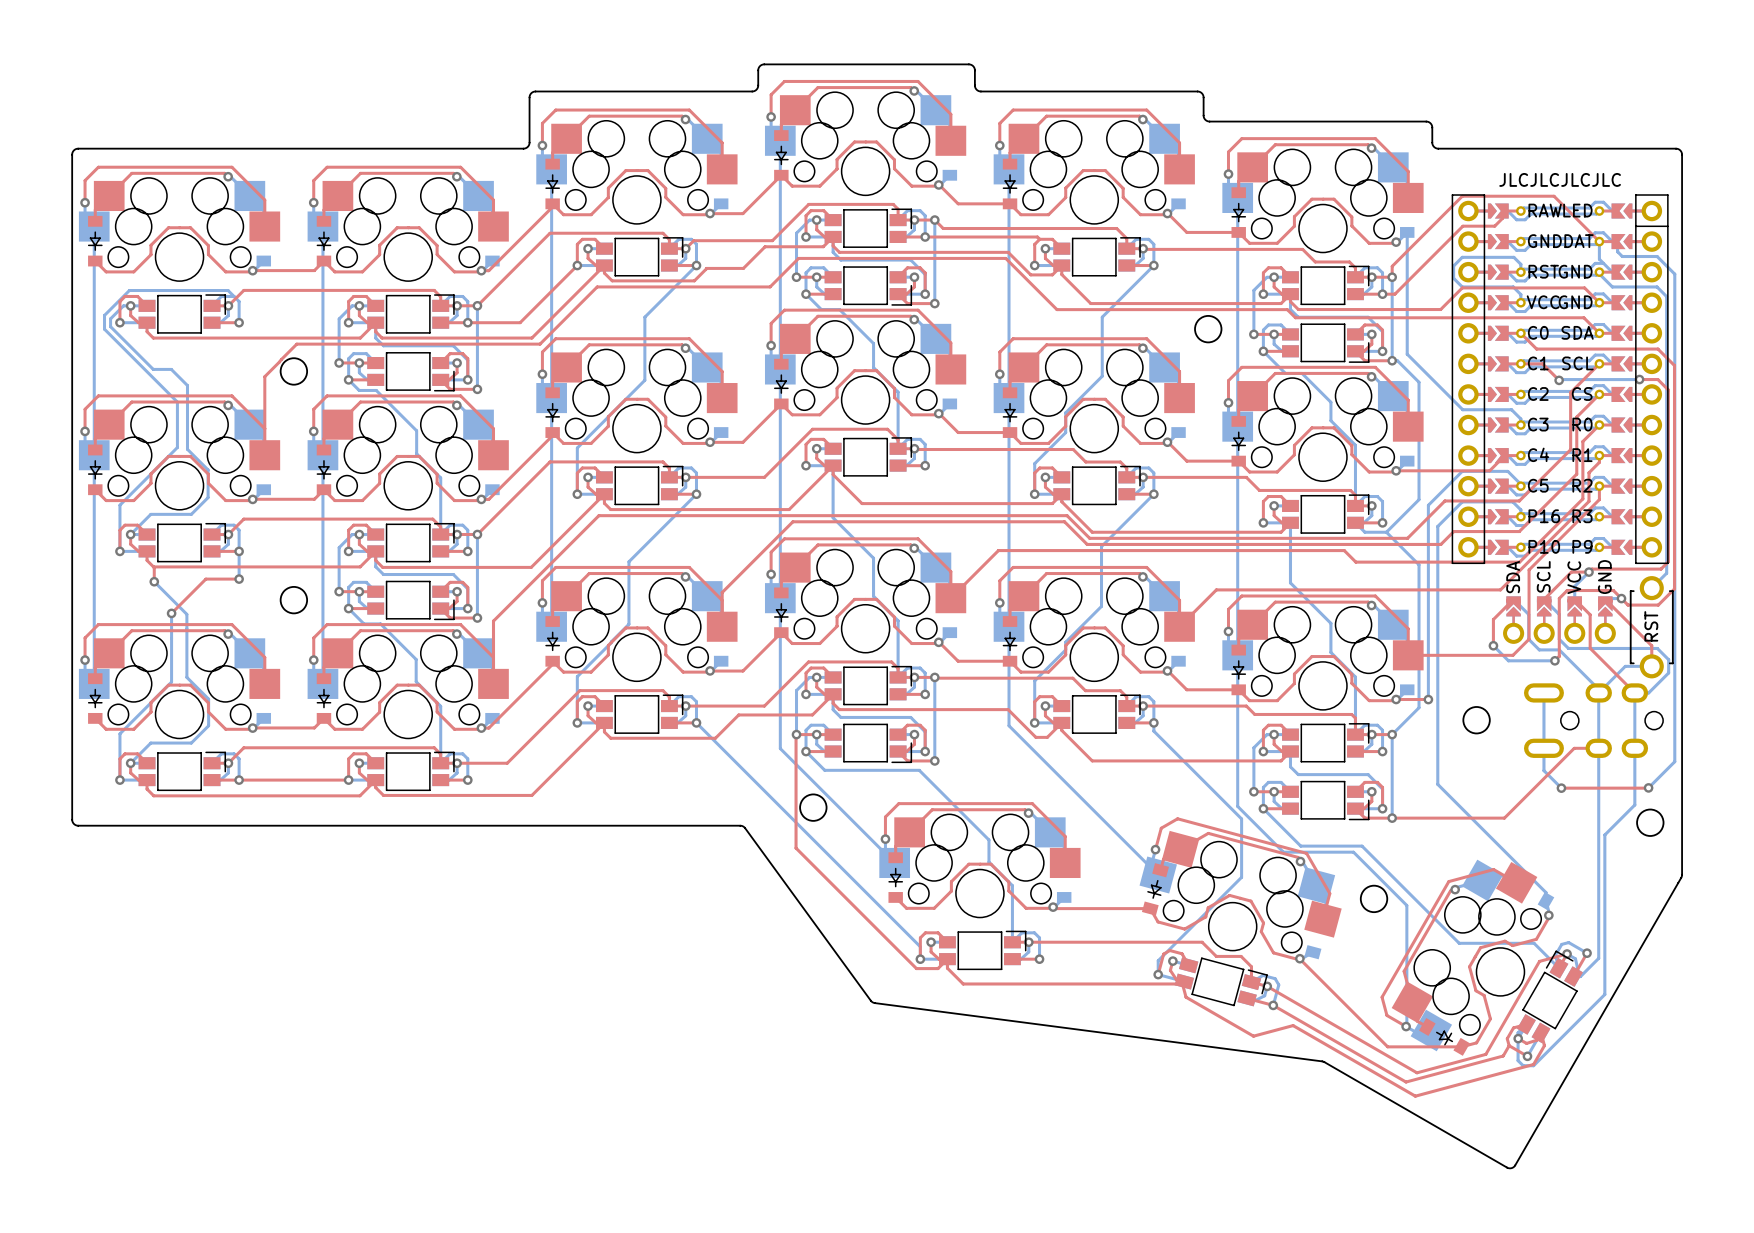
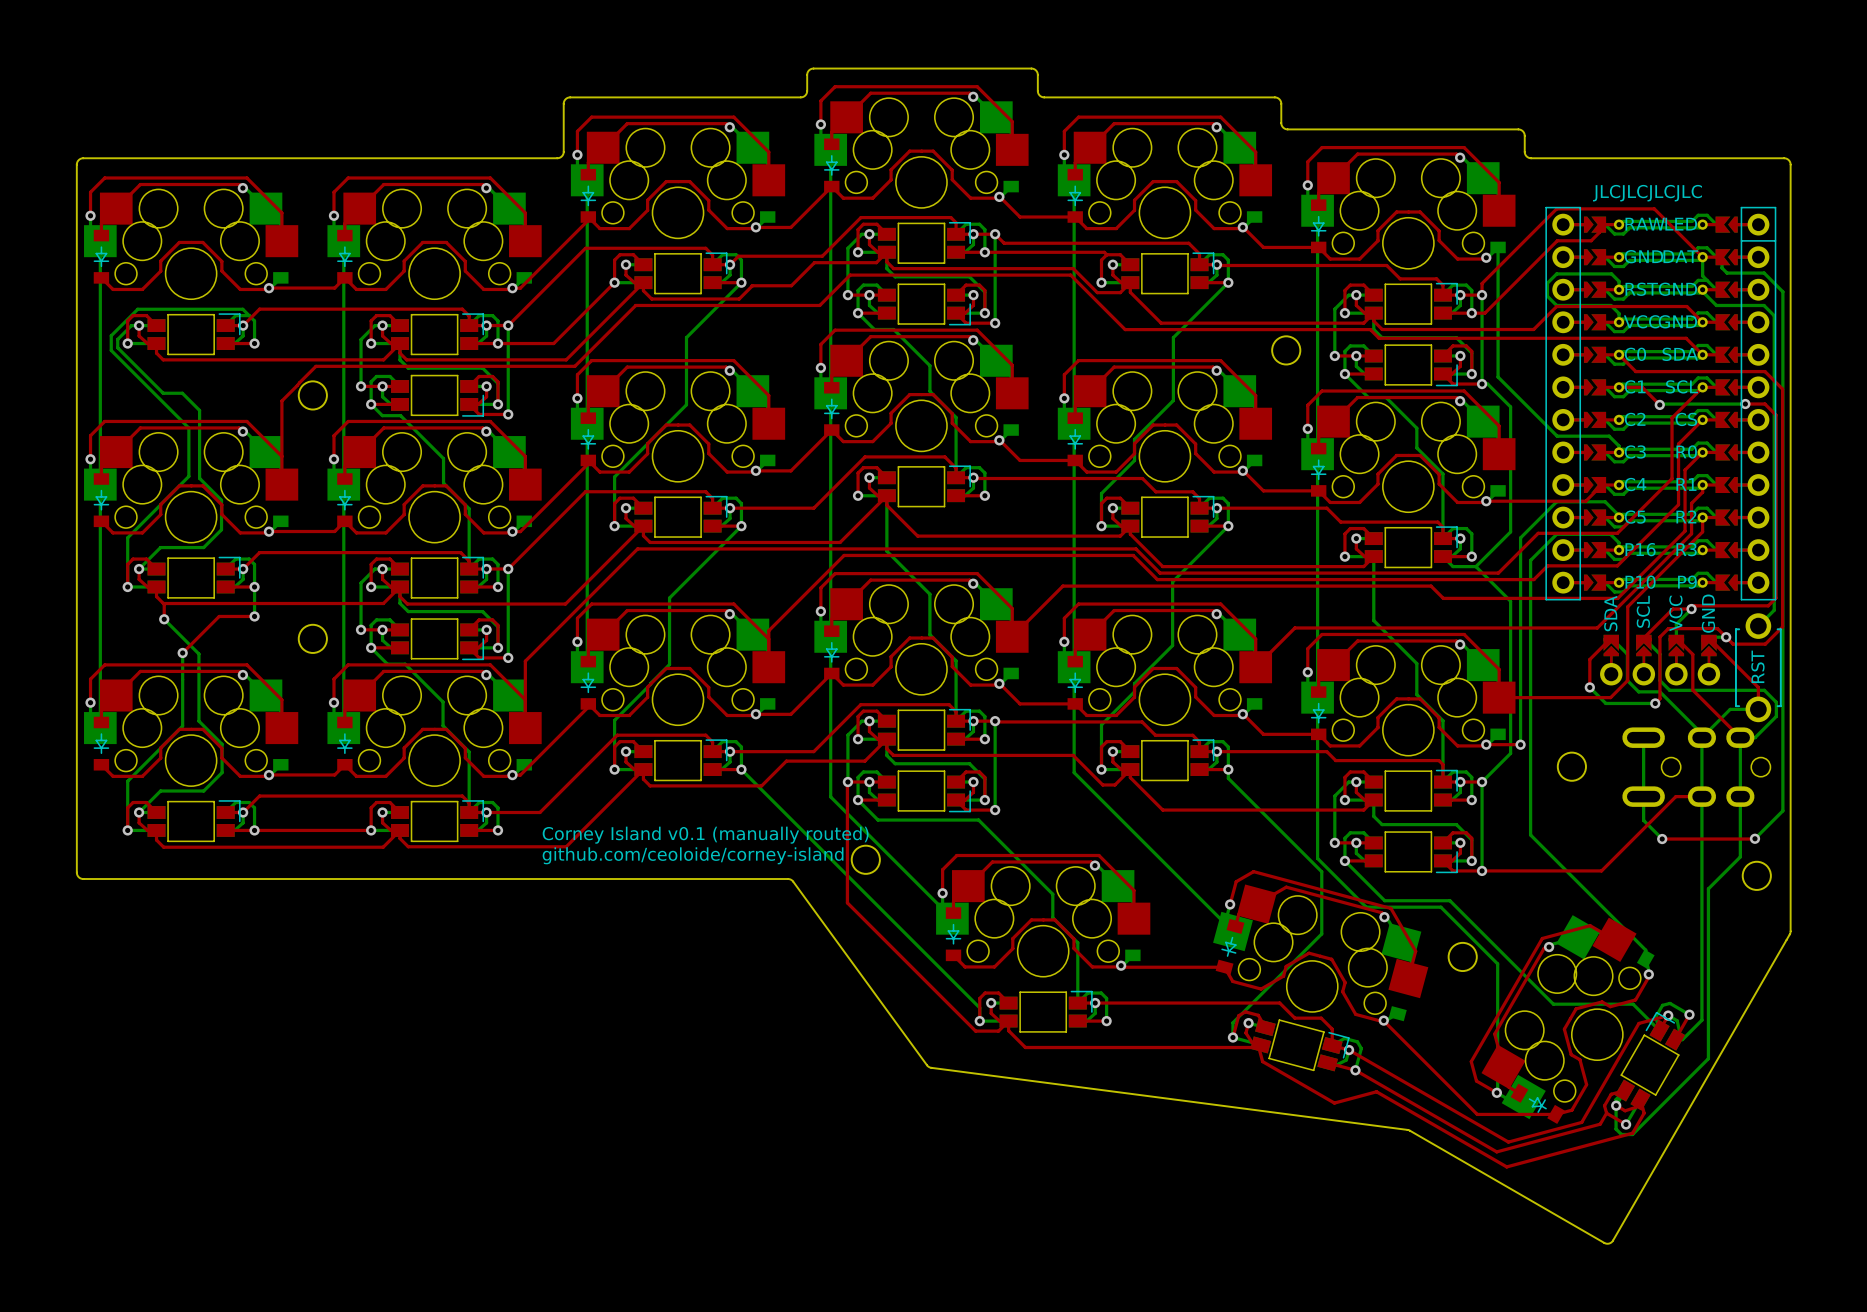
text: none -> Corney Island v0.1 (manually routed) (705, 835)
text: none -> github.com/ceoloide/corney-island (693, 855)

